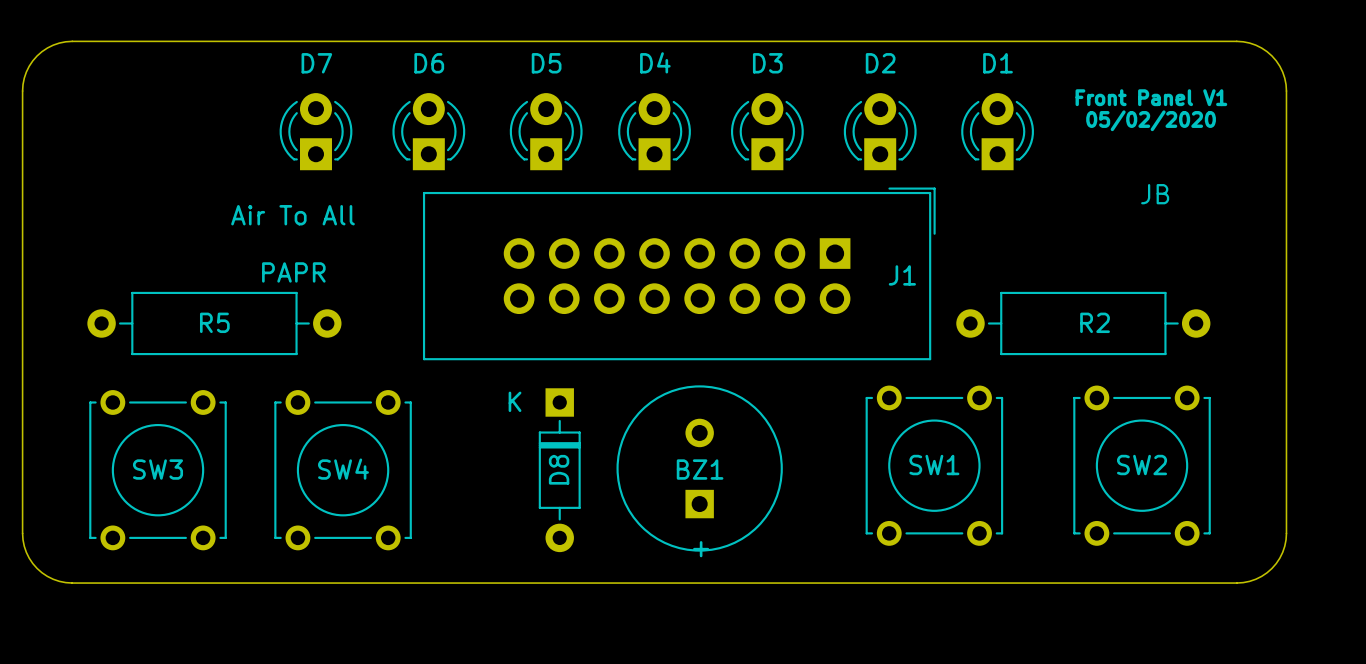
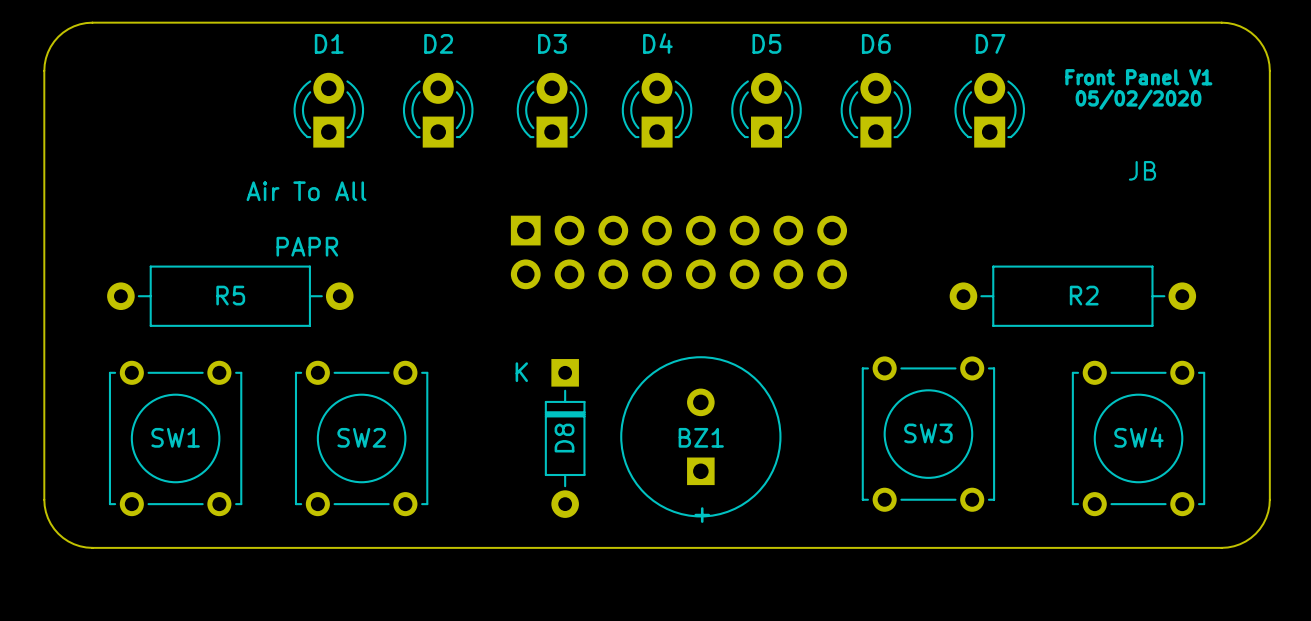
D7 name: D7 (316, 63) -> D1 (329, 43)
D6 name: D6 (429, 63) -> D2 (438, 43)
D5 name: D5 (546, 63) -> D3 (552, 43)
D3 name: D3 (767, 63) -> D5 (766, 43)
D2 name: D2 (880, 63) -> D6 (876, 43)
D1 name: D1 (998, 63) -> D7 (990, 43)
J1 side: top (679, 273) -> bottom (678, 252)
SW1 name: SW1 (934, 465) -> SW3 (928, 433)
SW2 position: (1142, 465) -> (361, 438)
SW3 name: SW3 (158, 469) -> SW1 (175, 437)
SW4 position: (343, 470) -> (1138, 438)

